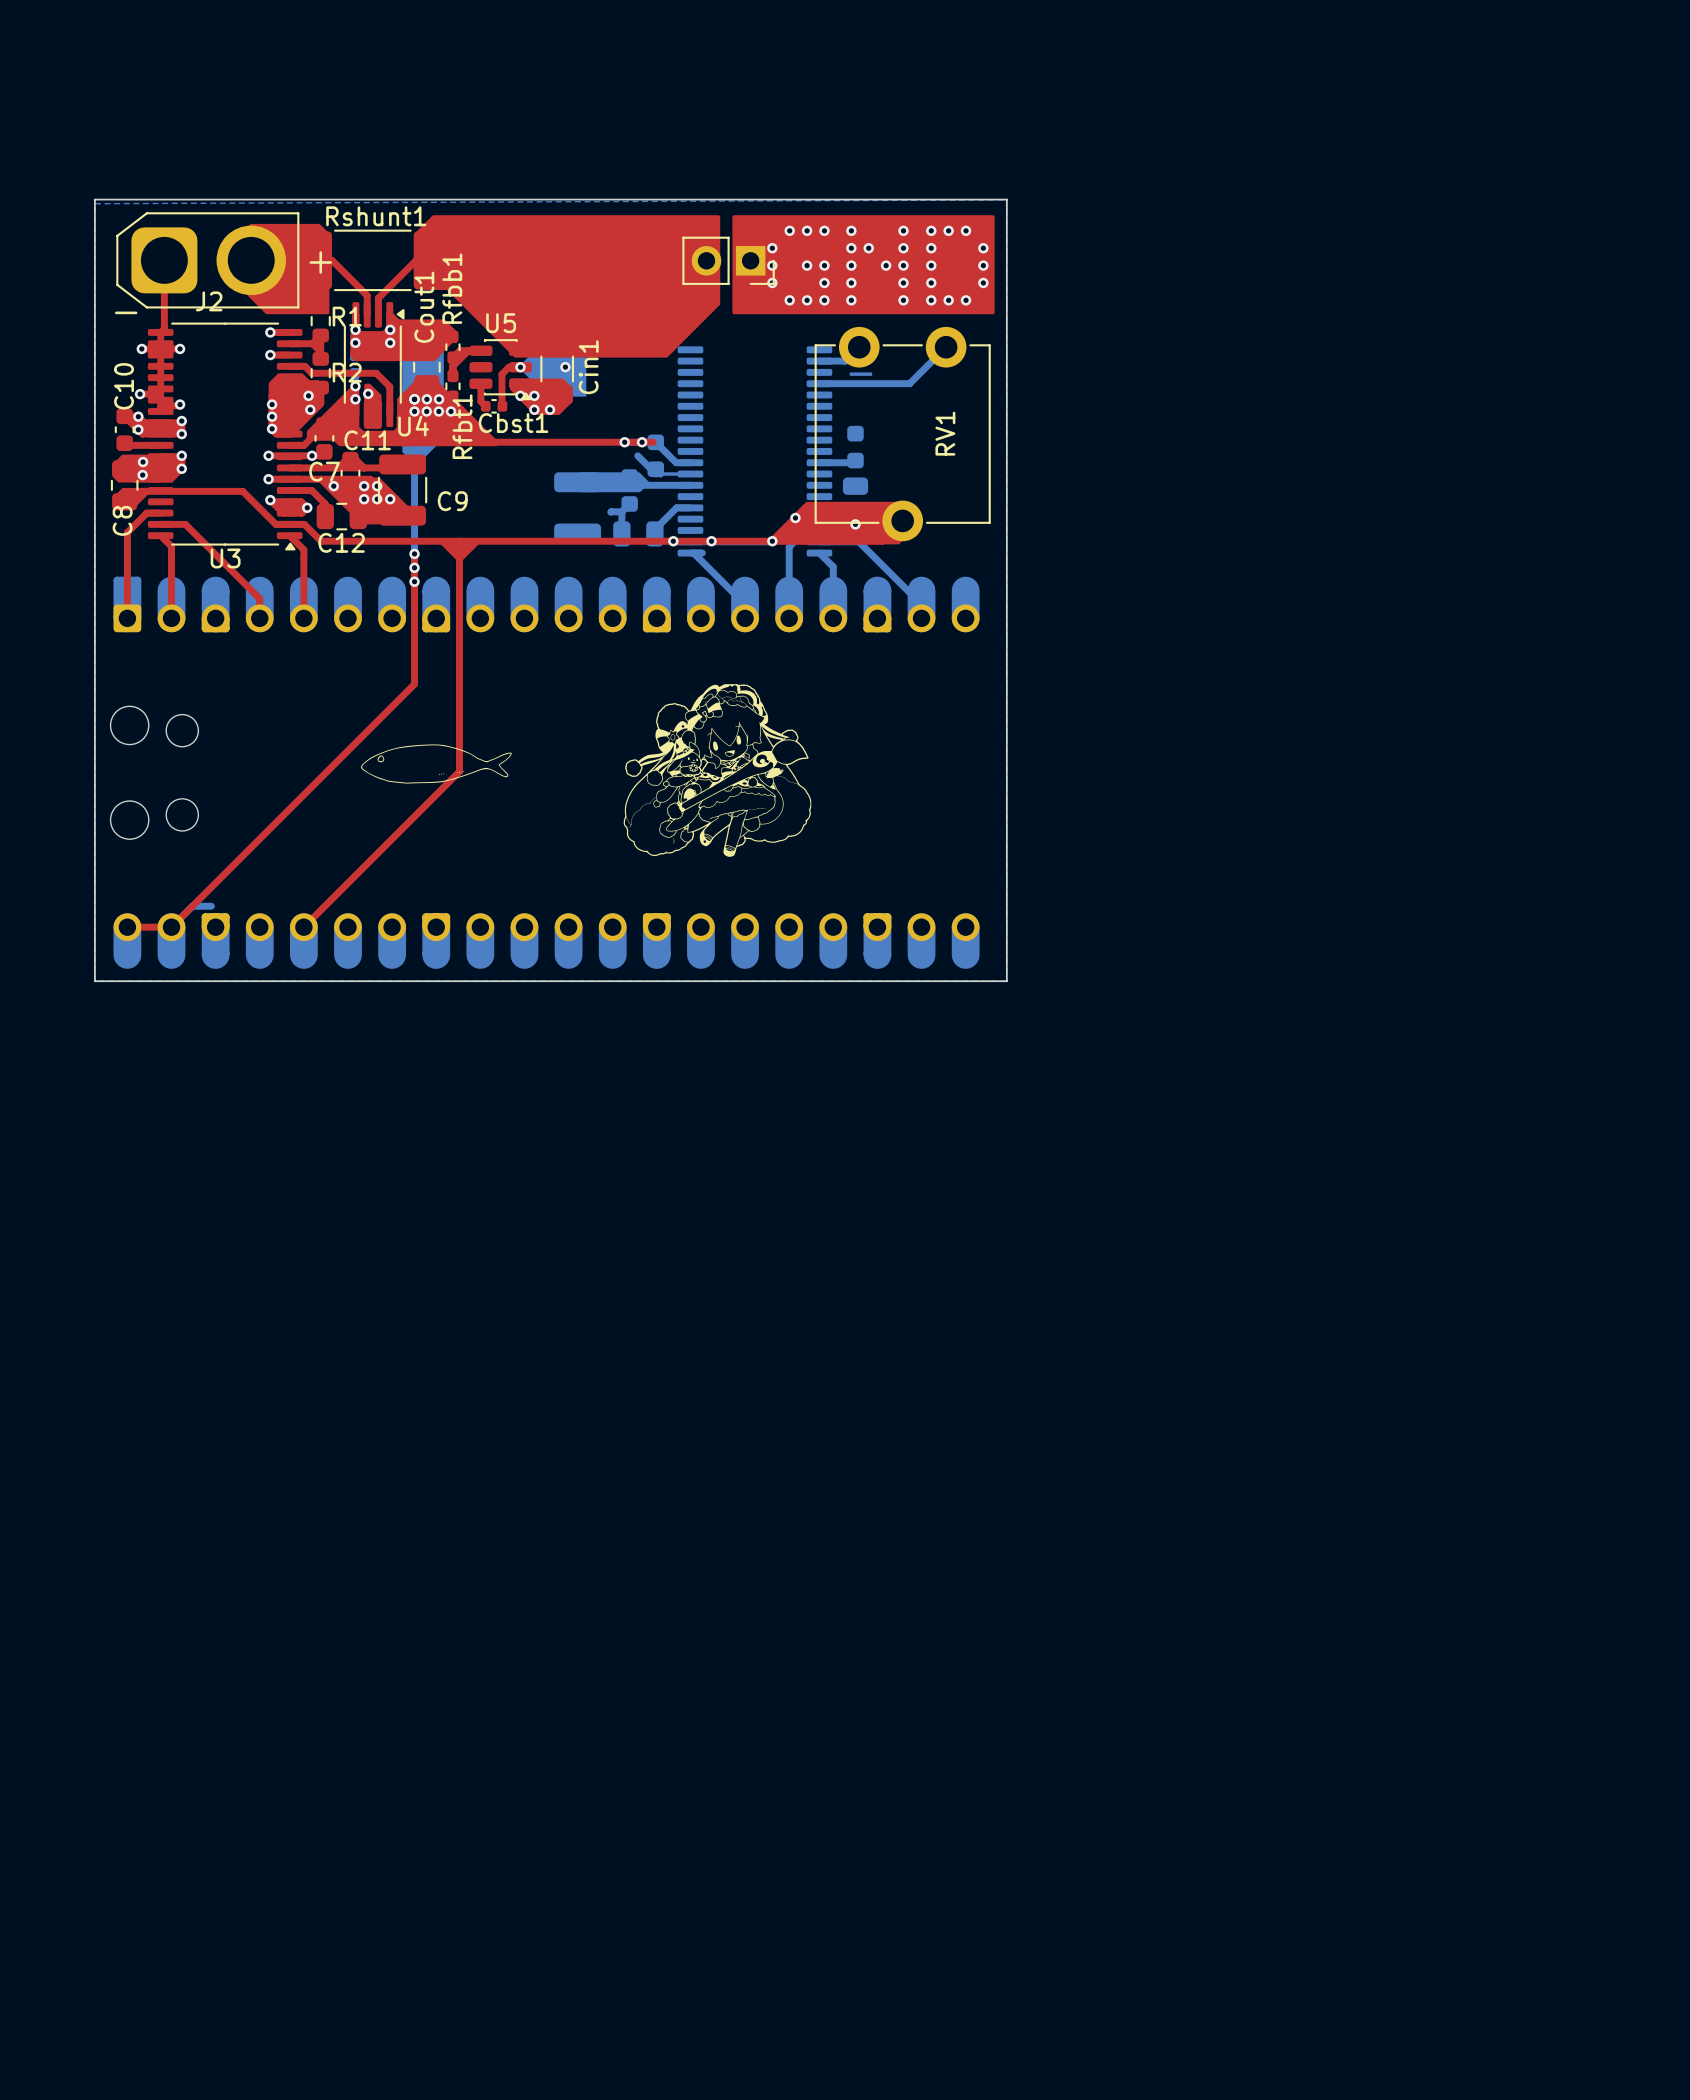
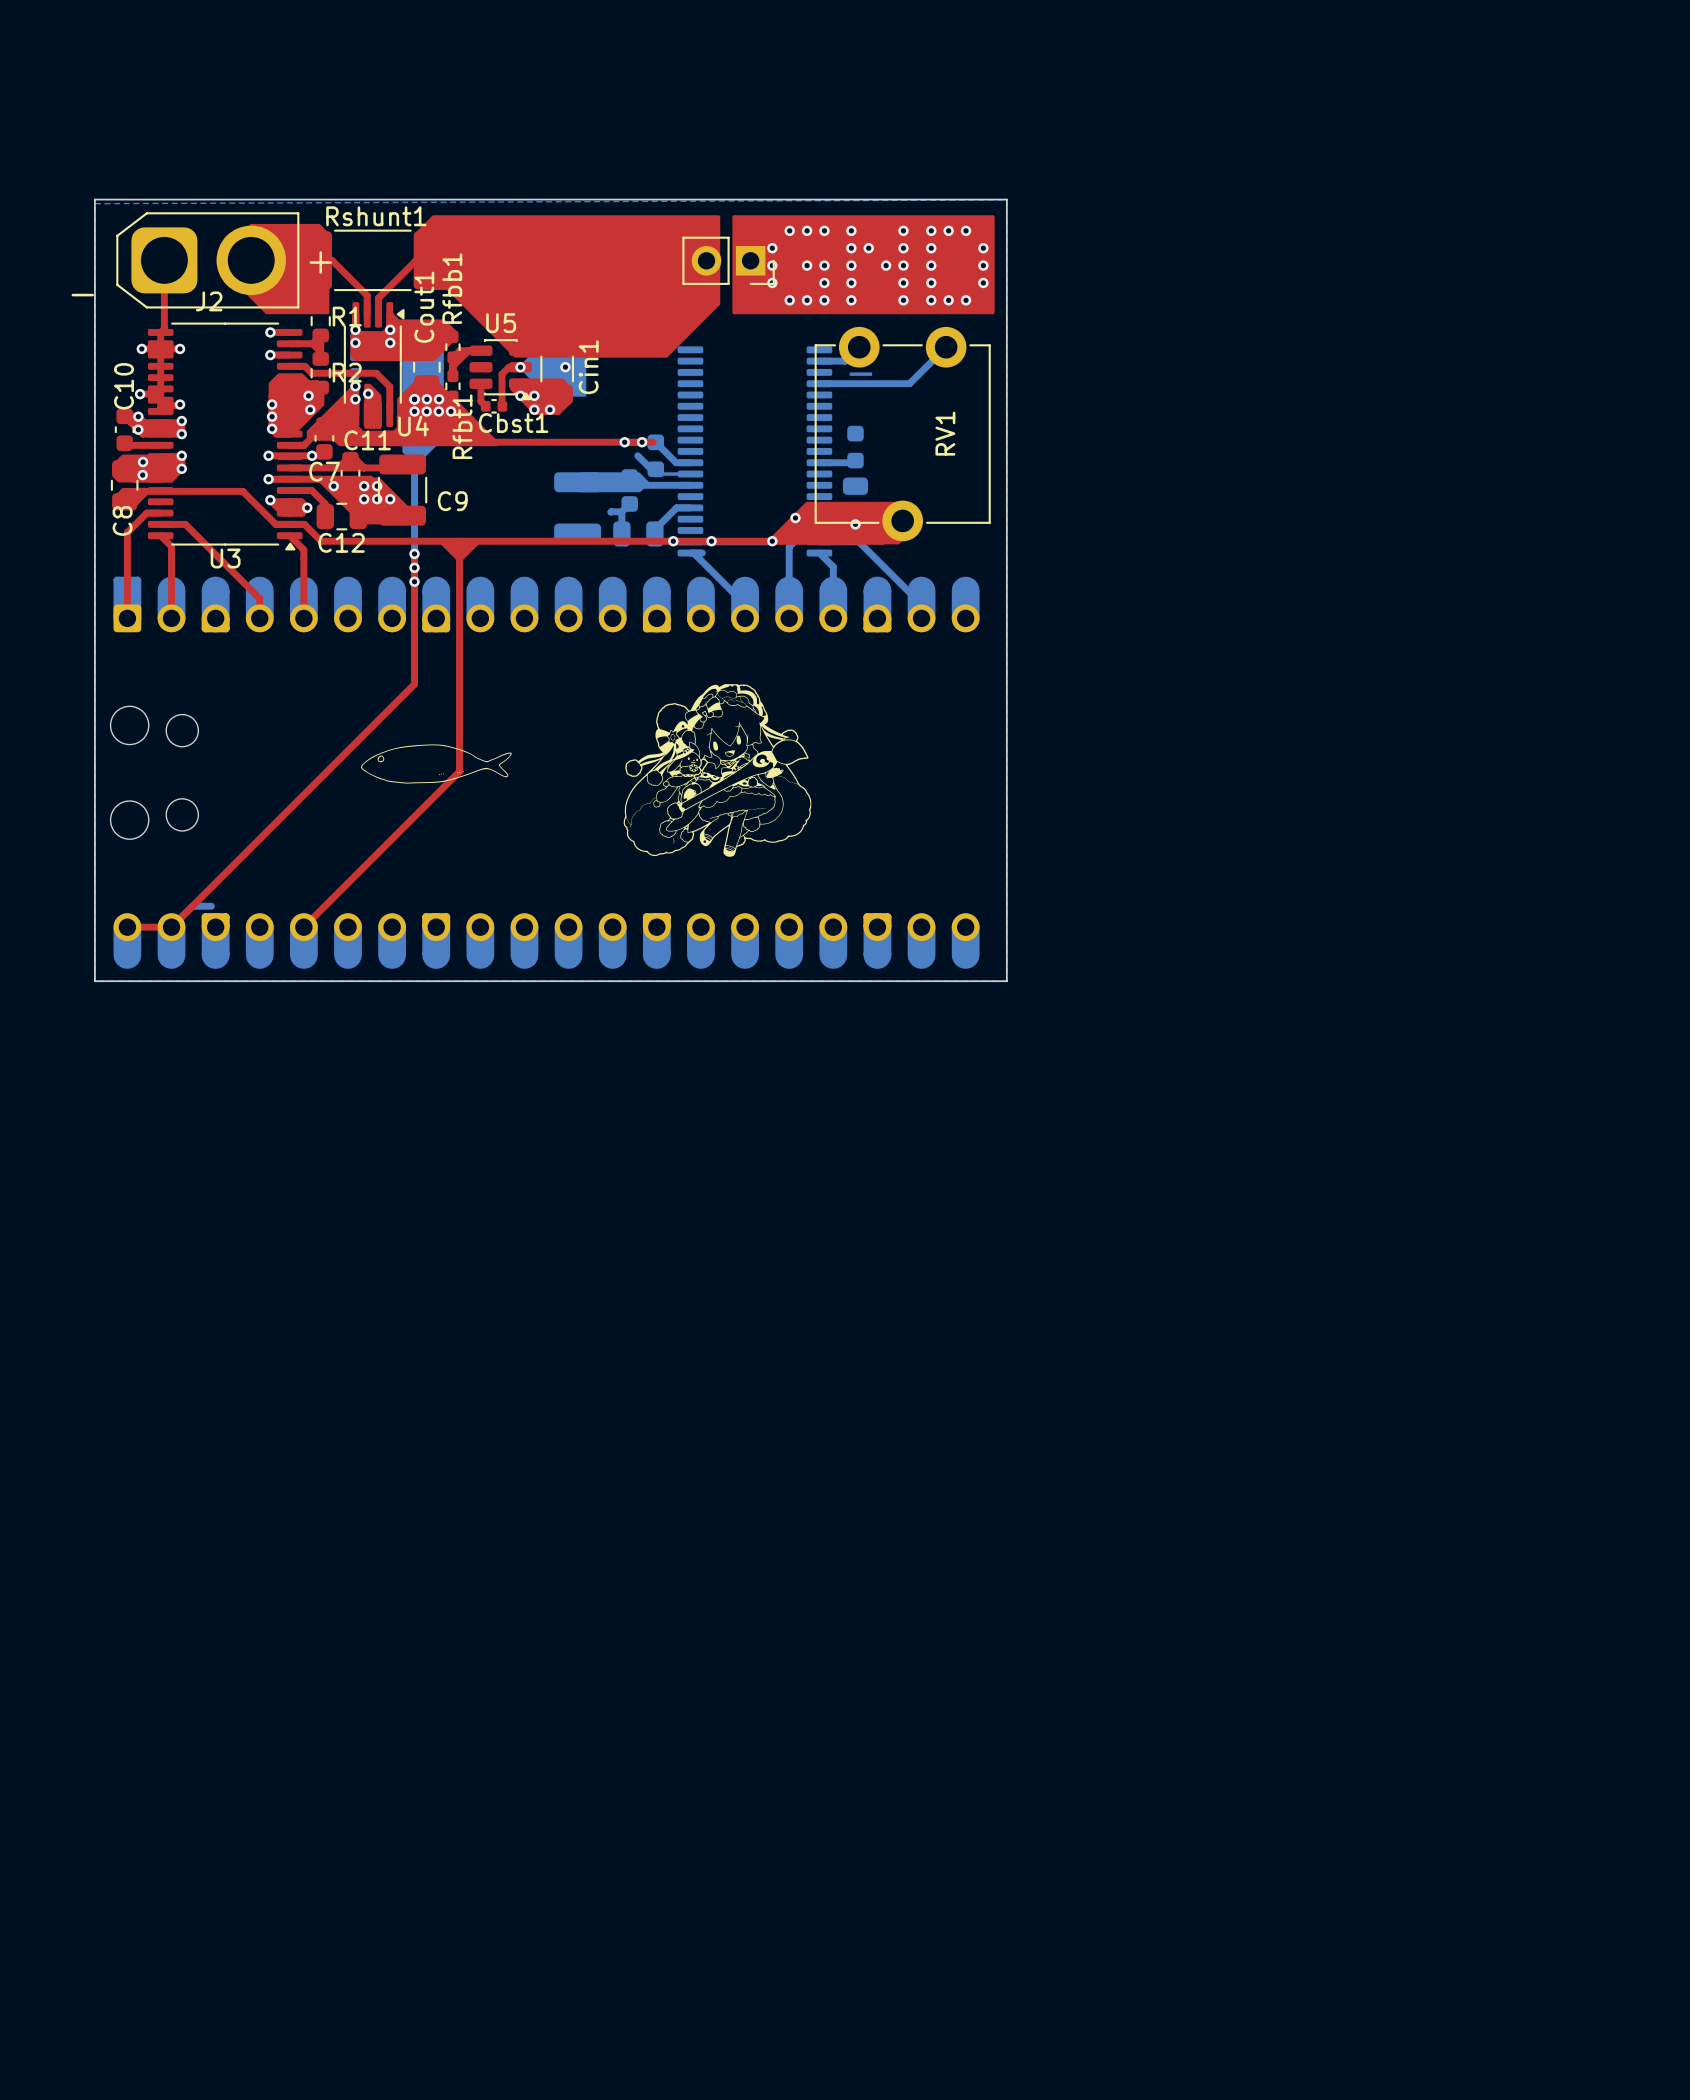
J2 text position: - (126, 312) -> - (82, 295)

